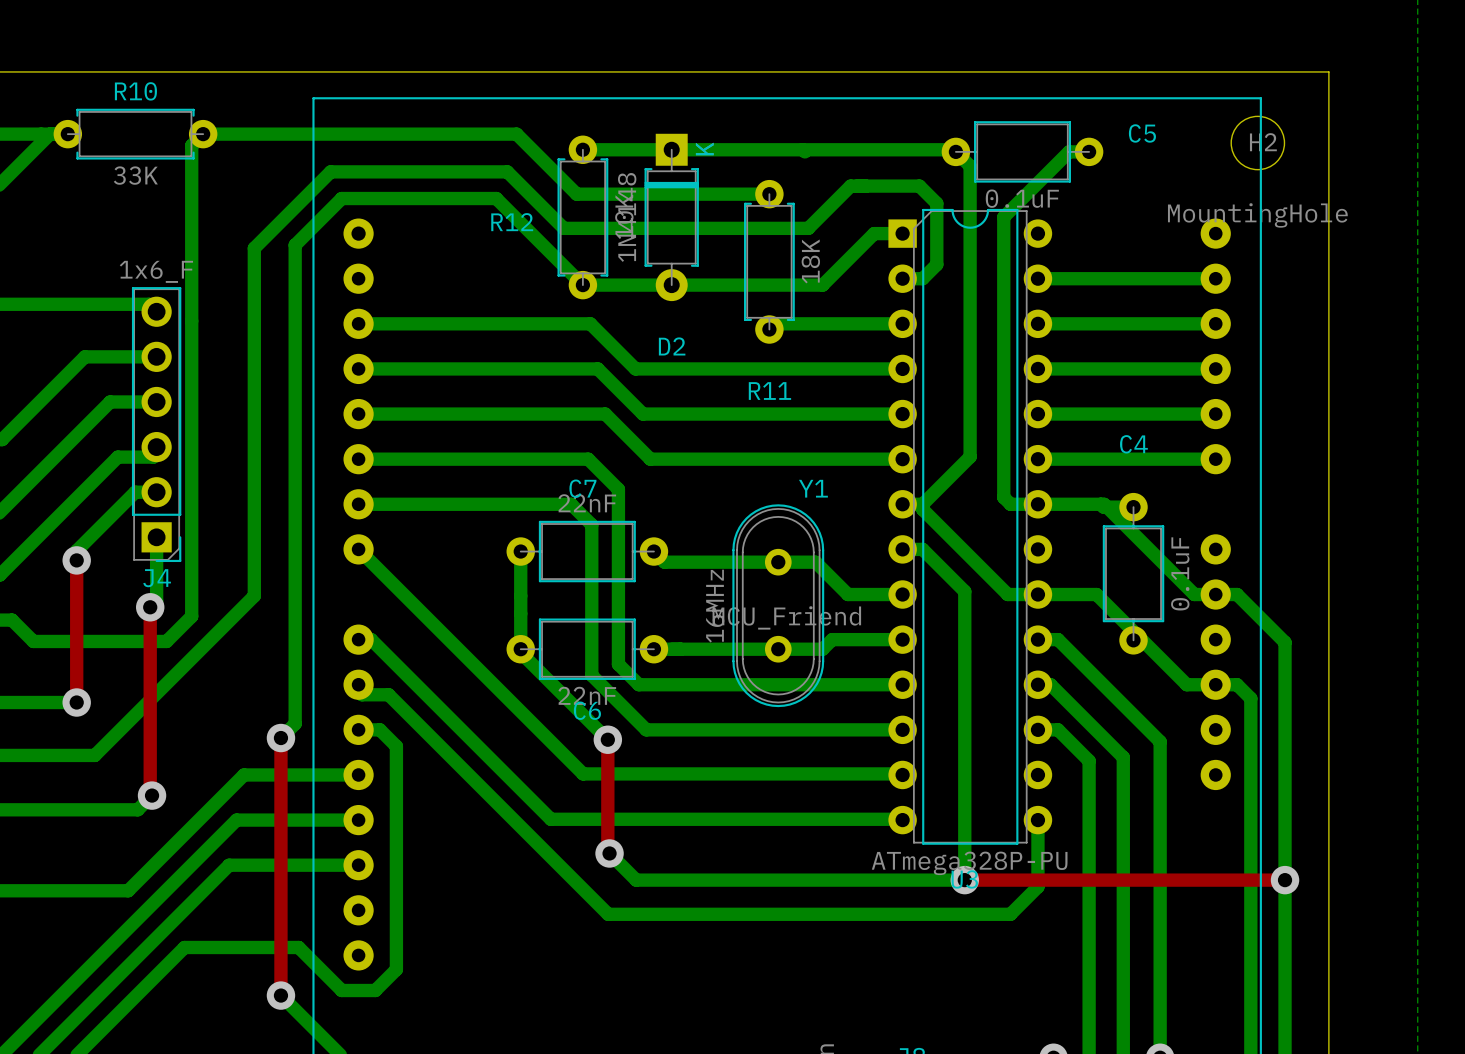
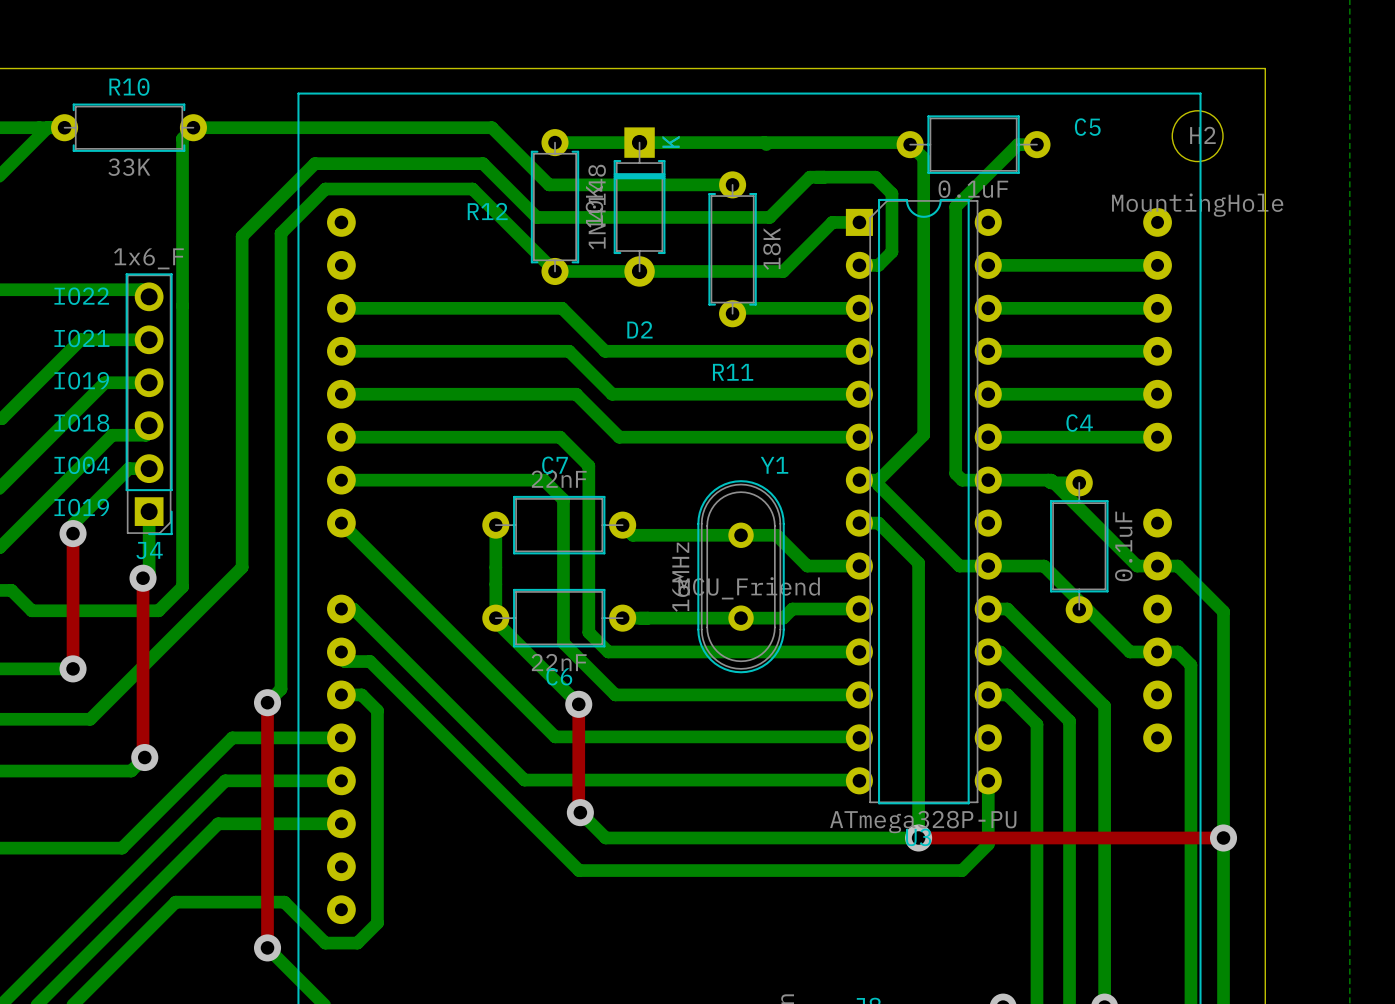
text: none -> IO22 (81, 296)
text: none -> IO21 (81, 338)
text: none -> IO19 (81, 380)
text: none -> IO18 (81, 423)
text: none -> IO04 (82, 465)
text: none -> IO19 (81, 507)

